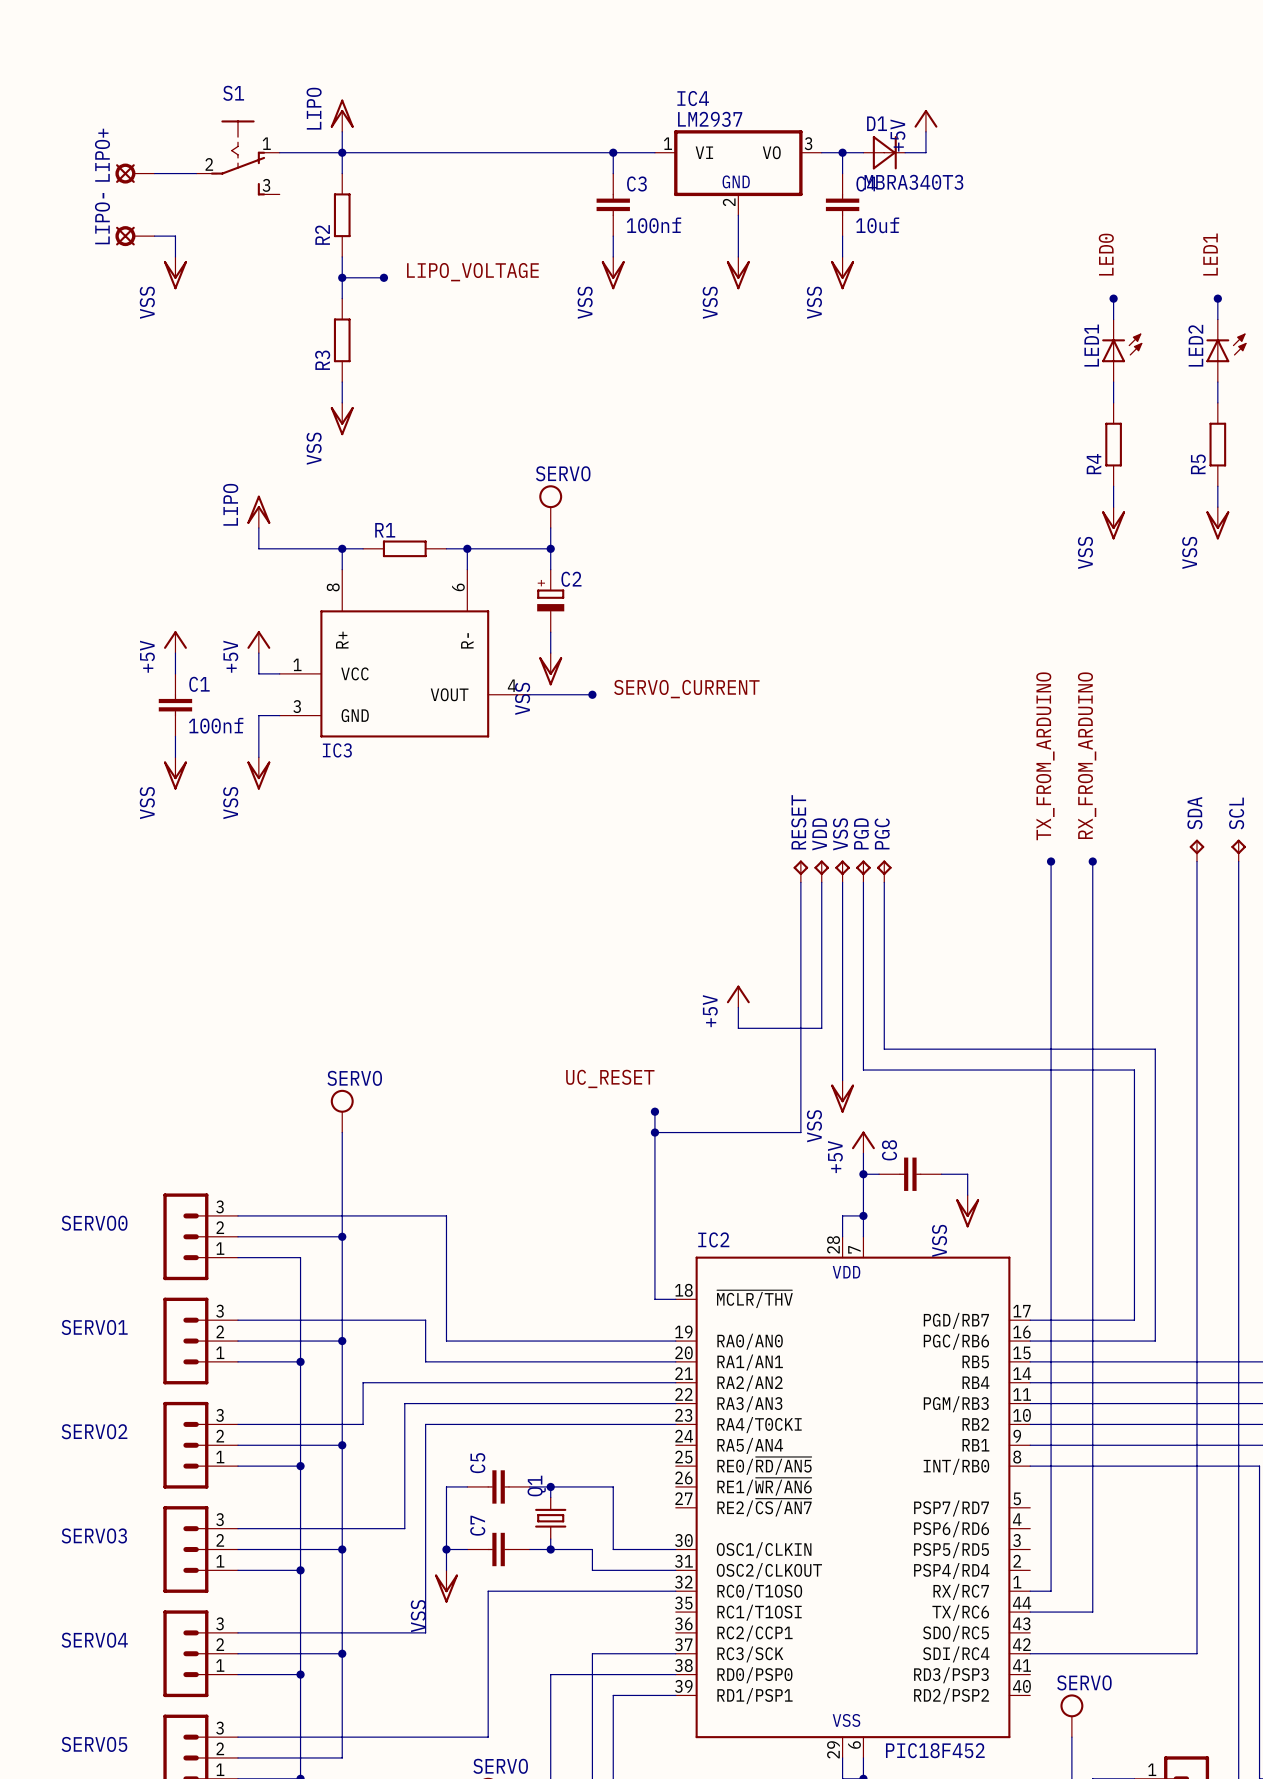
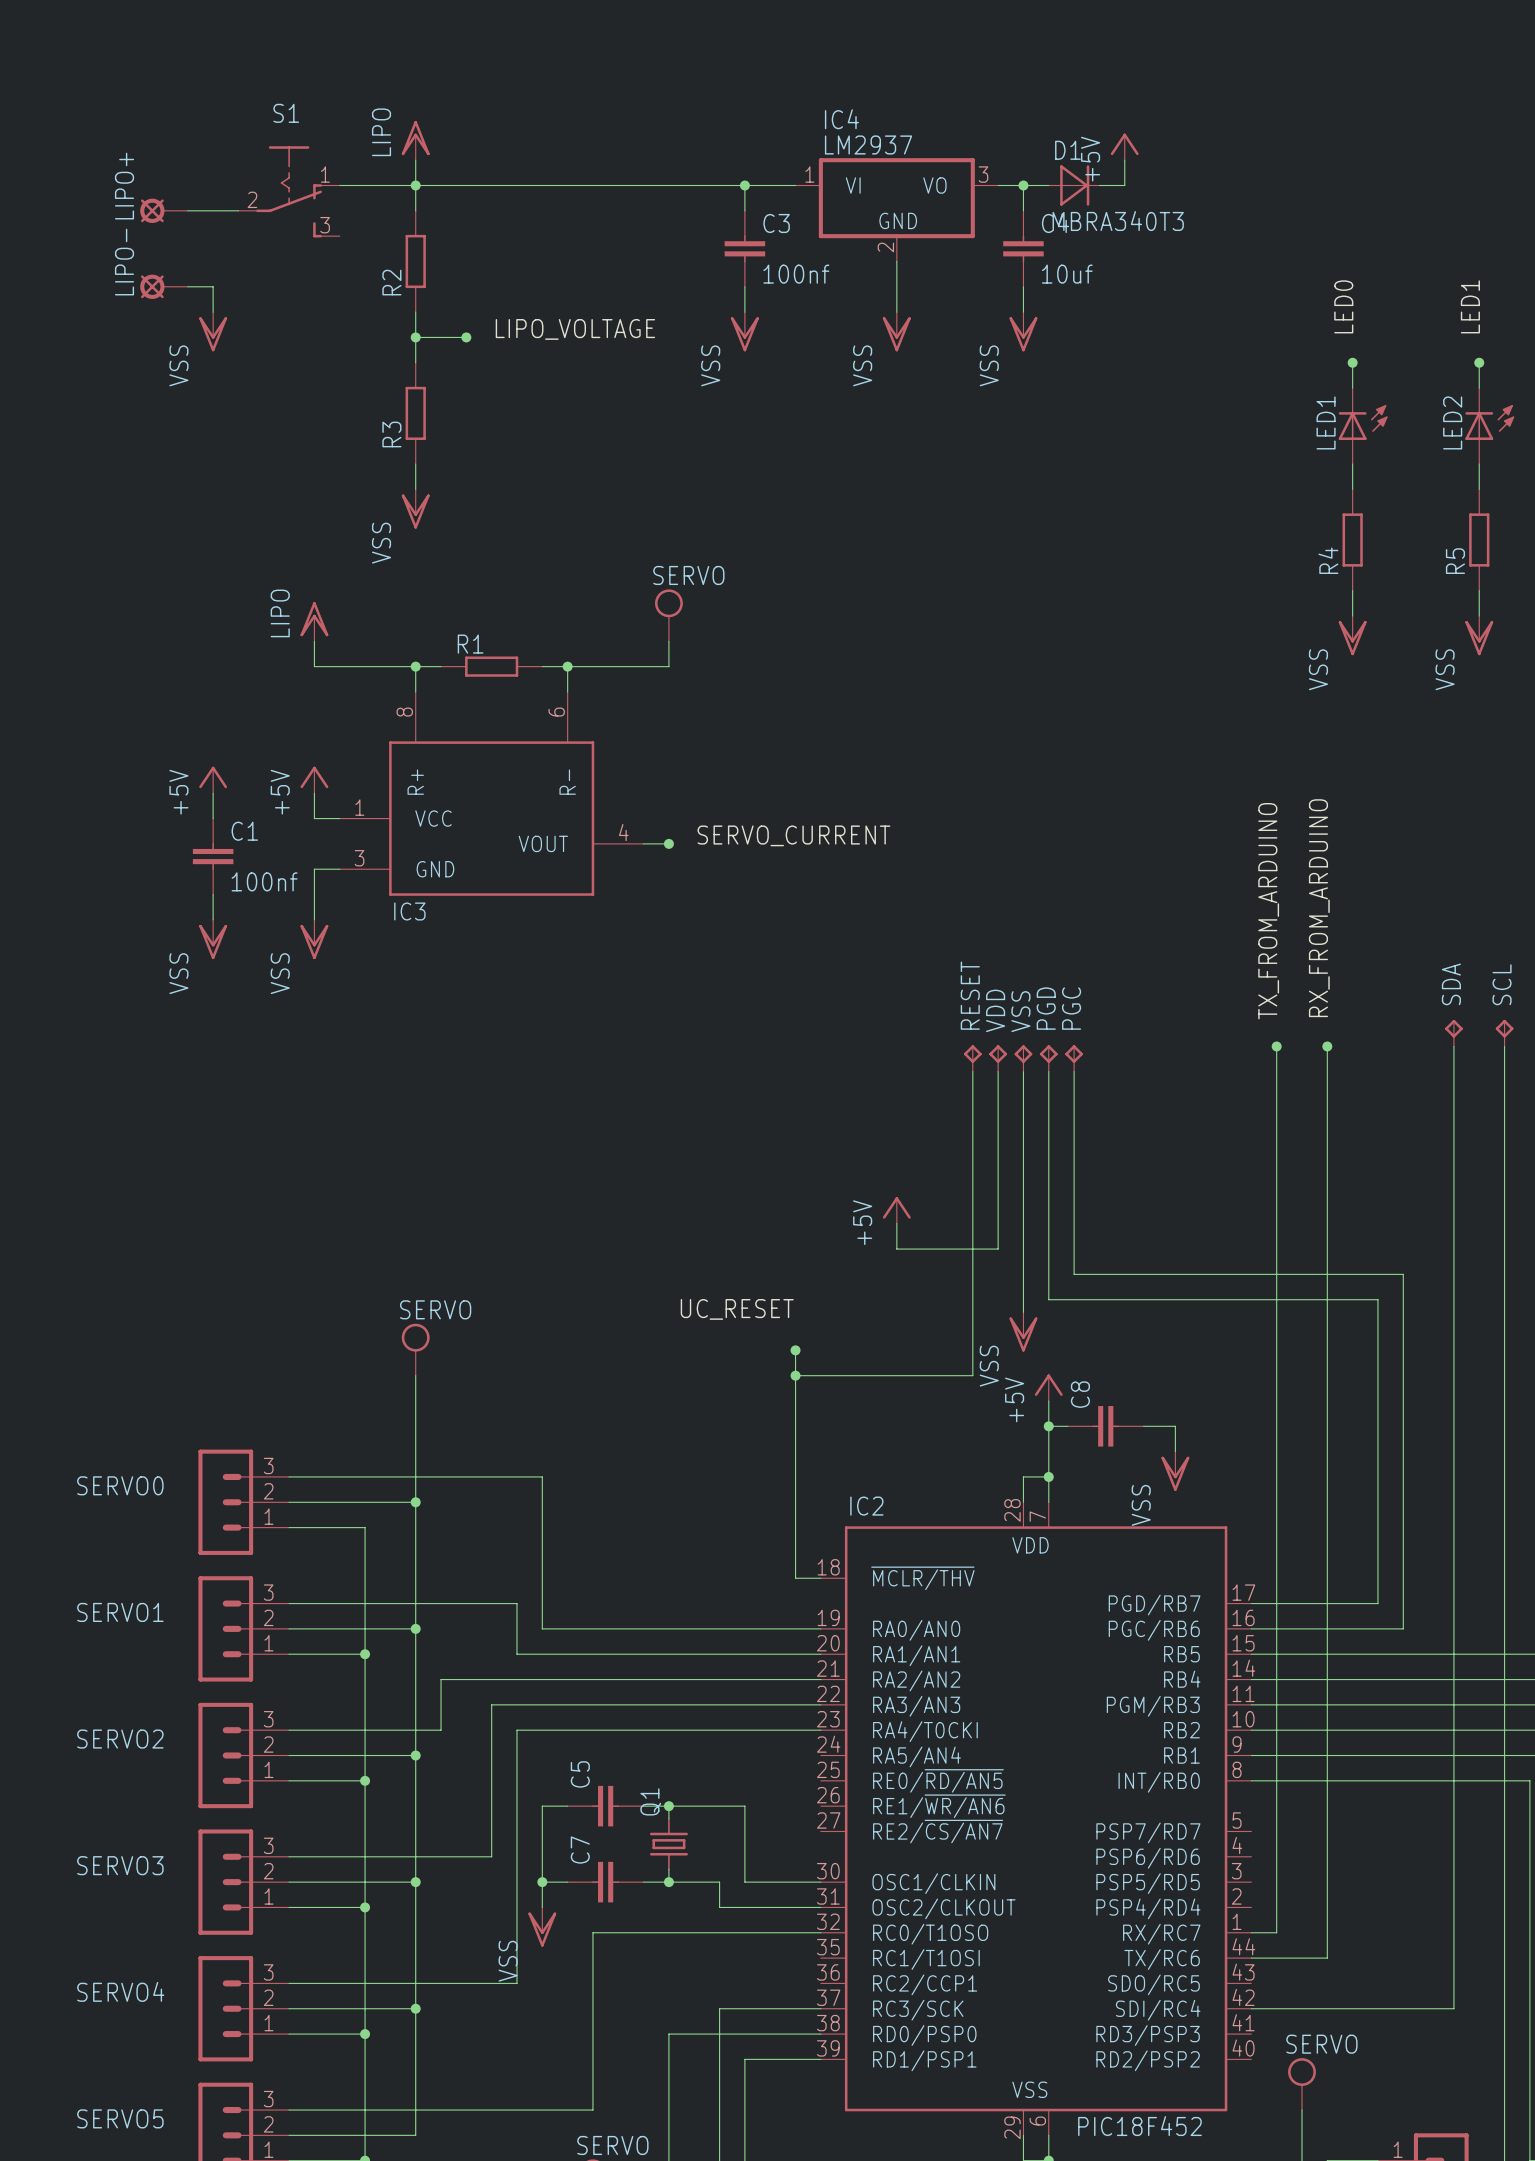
wire: (550, 548) (550, 569) -> none
junction: (550, 548) -> none
C2: (550, 600) -> none
wire: (550, 632) (550, 653) -> none
power symbol: VSS (550, 669) -> none
label position: SERVO_CURRENT (686, 689) -> SERVO_CURRENT (793, 835)
wire: (550, 694) (592, 694) -> none
junction position: (592, 694) -> (668, 843)

